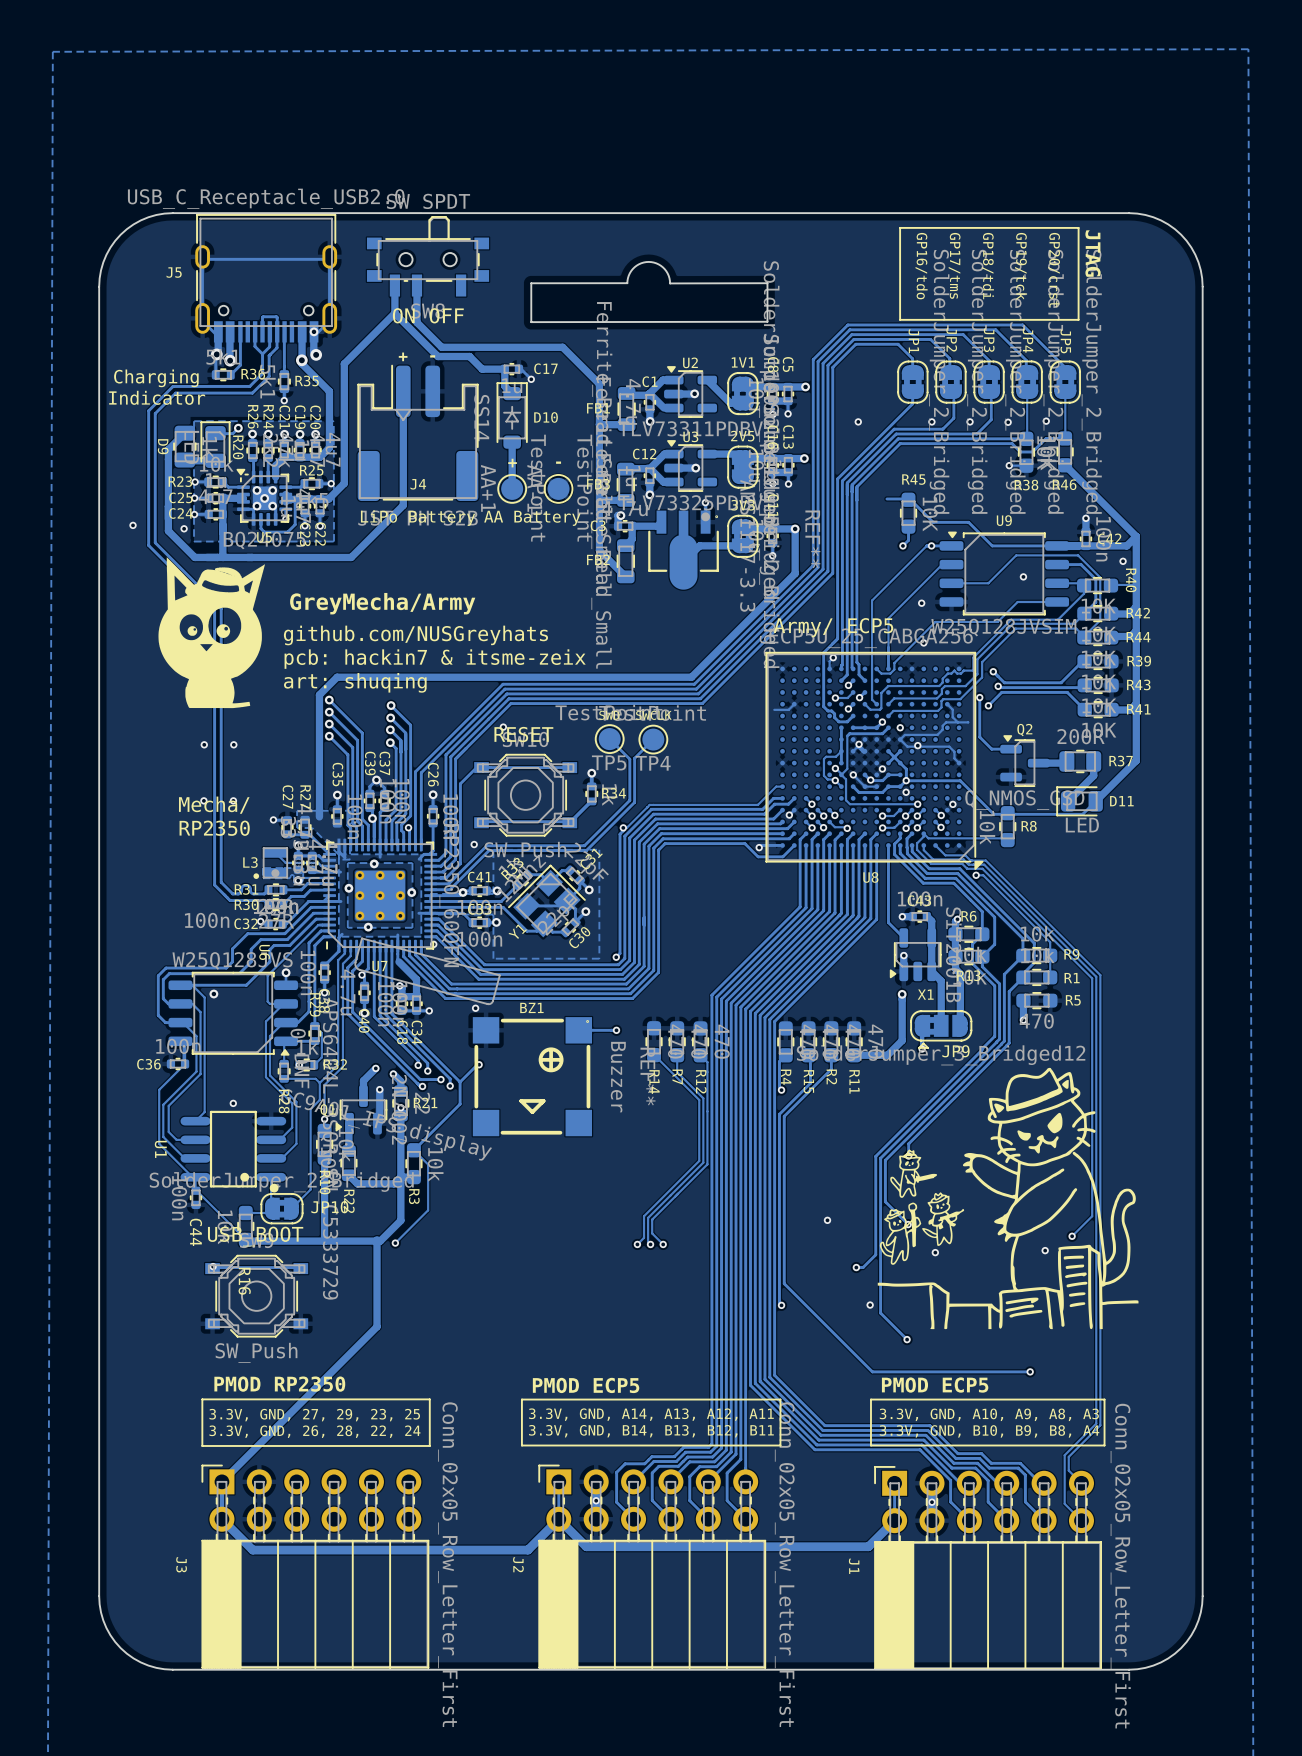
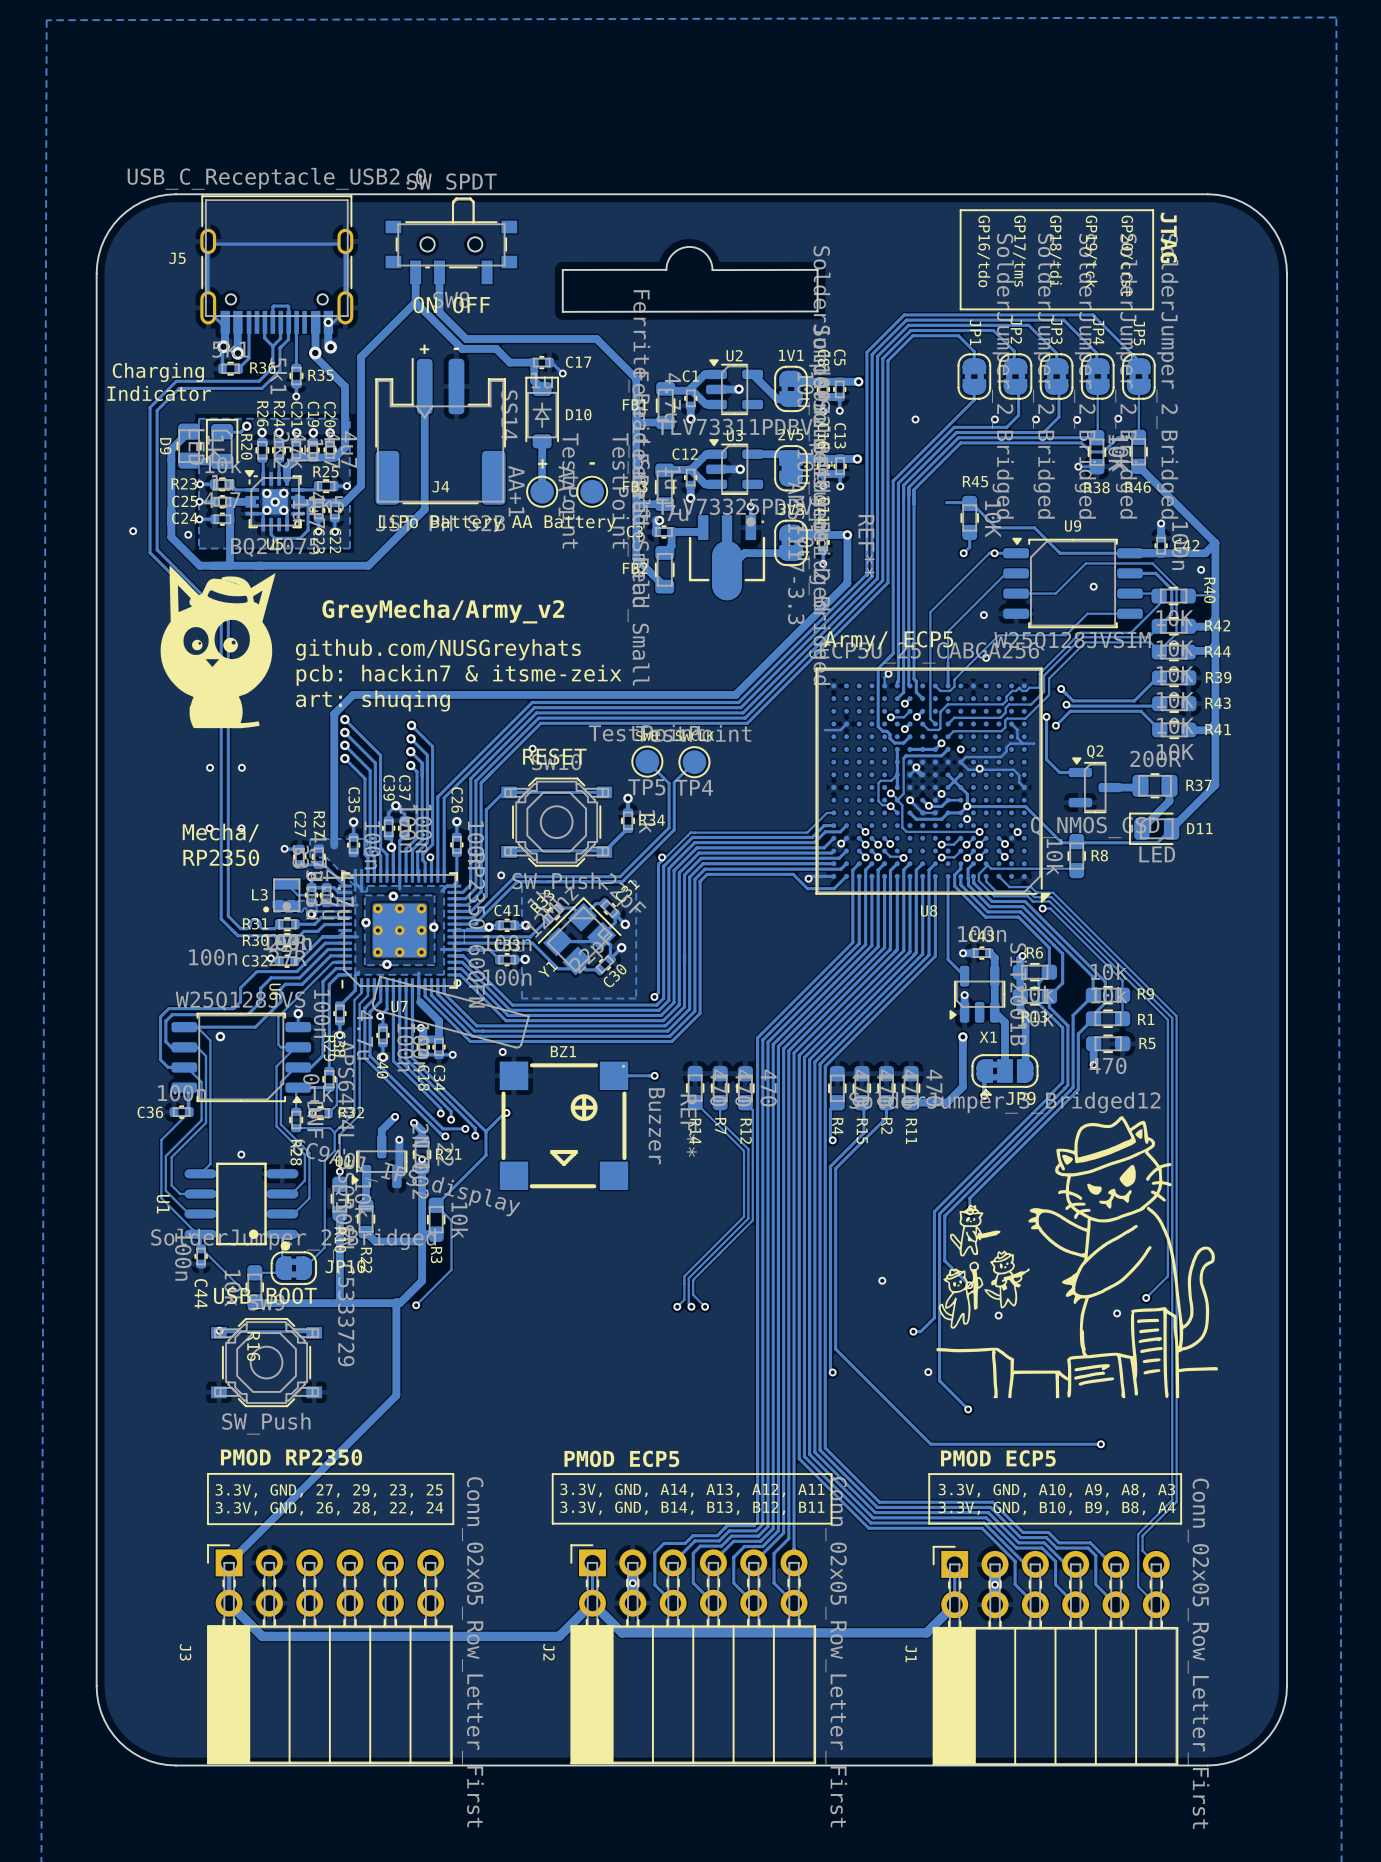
text: GreyMecha/Army (382, 603) -> GreyMecha/Army_v2 (443, 611)

